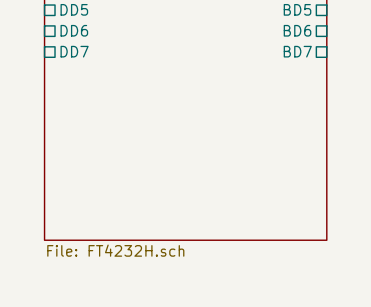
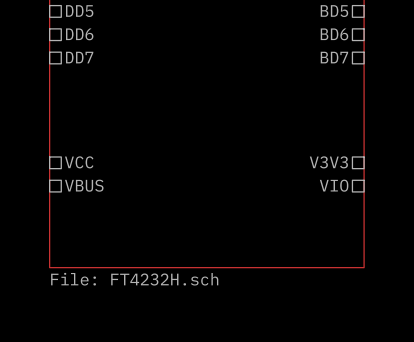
sheet pin: none -> VCC (79, 162)
sheet pin: none -> V3V3 (328, 162)
sheet pin: none -> VBUS (84, 185)
sheet pin: none -> VIO (334, 185)

